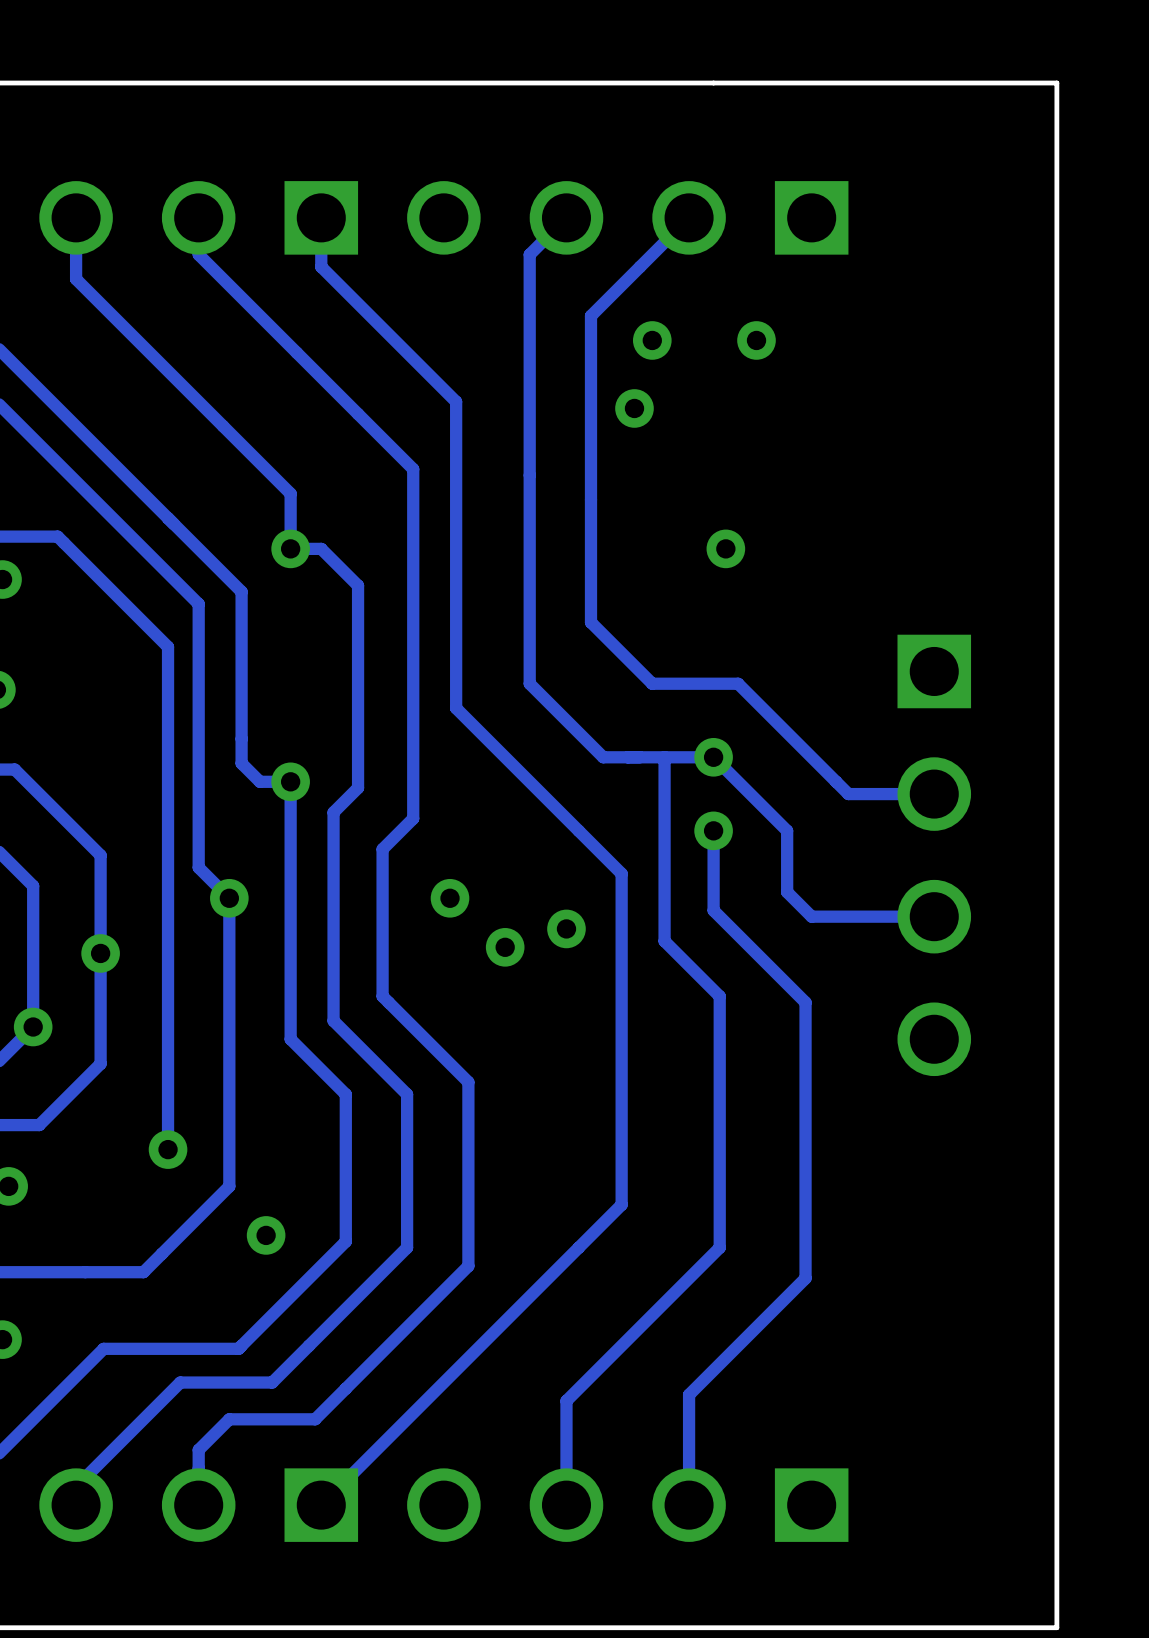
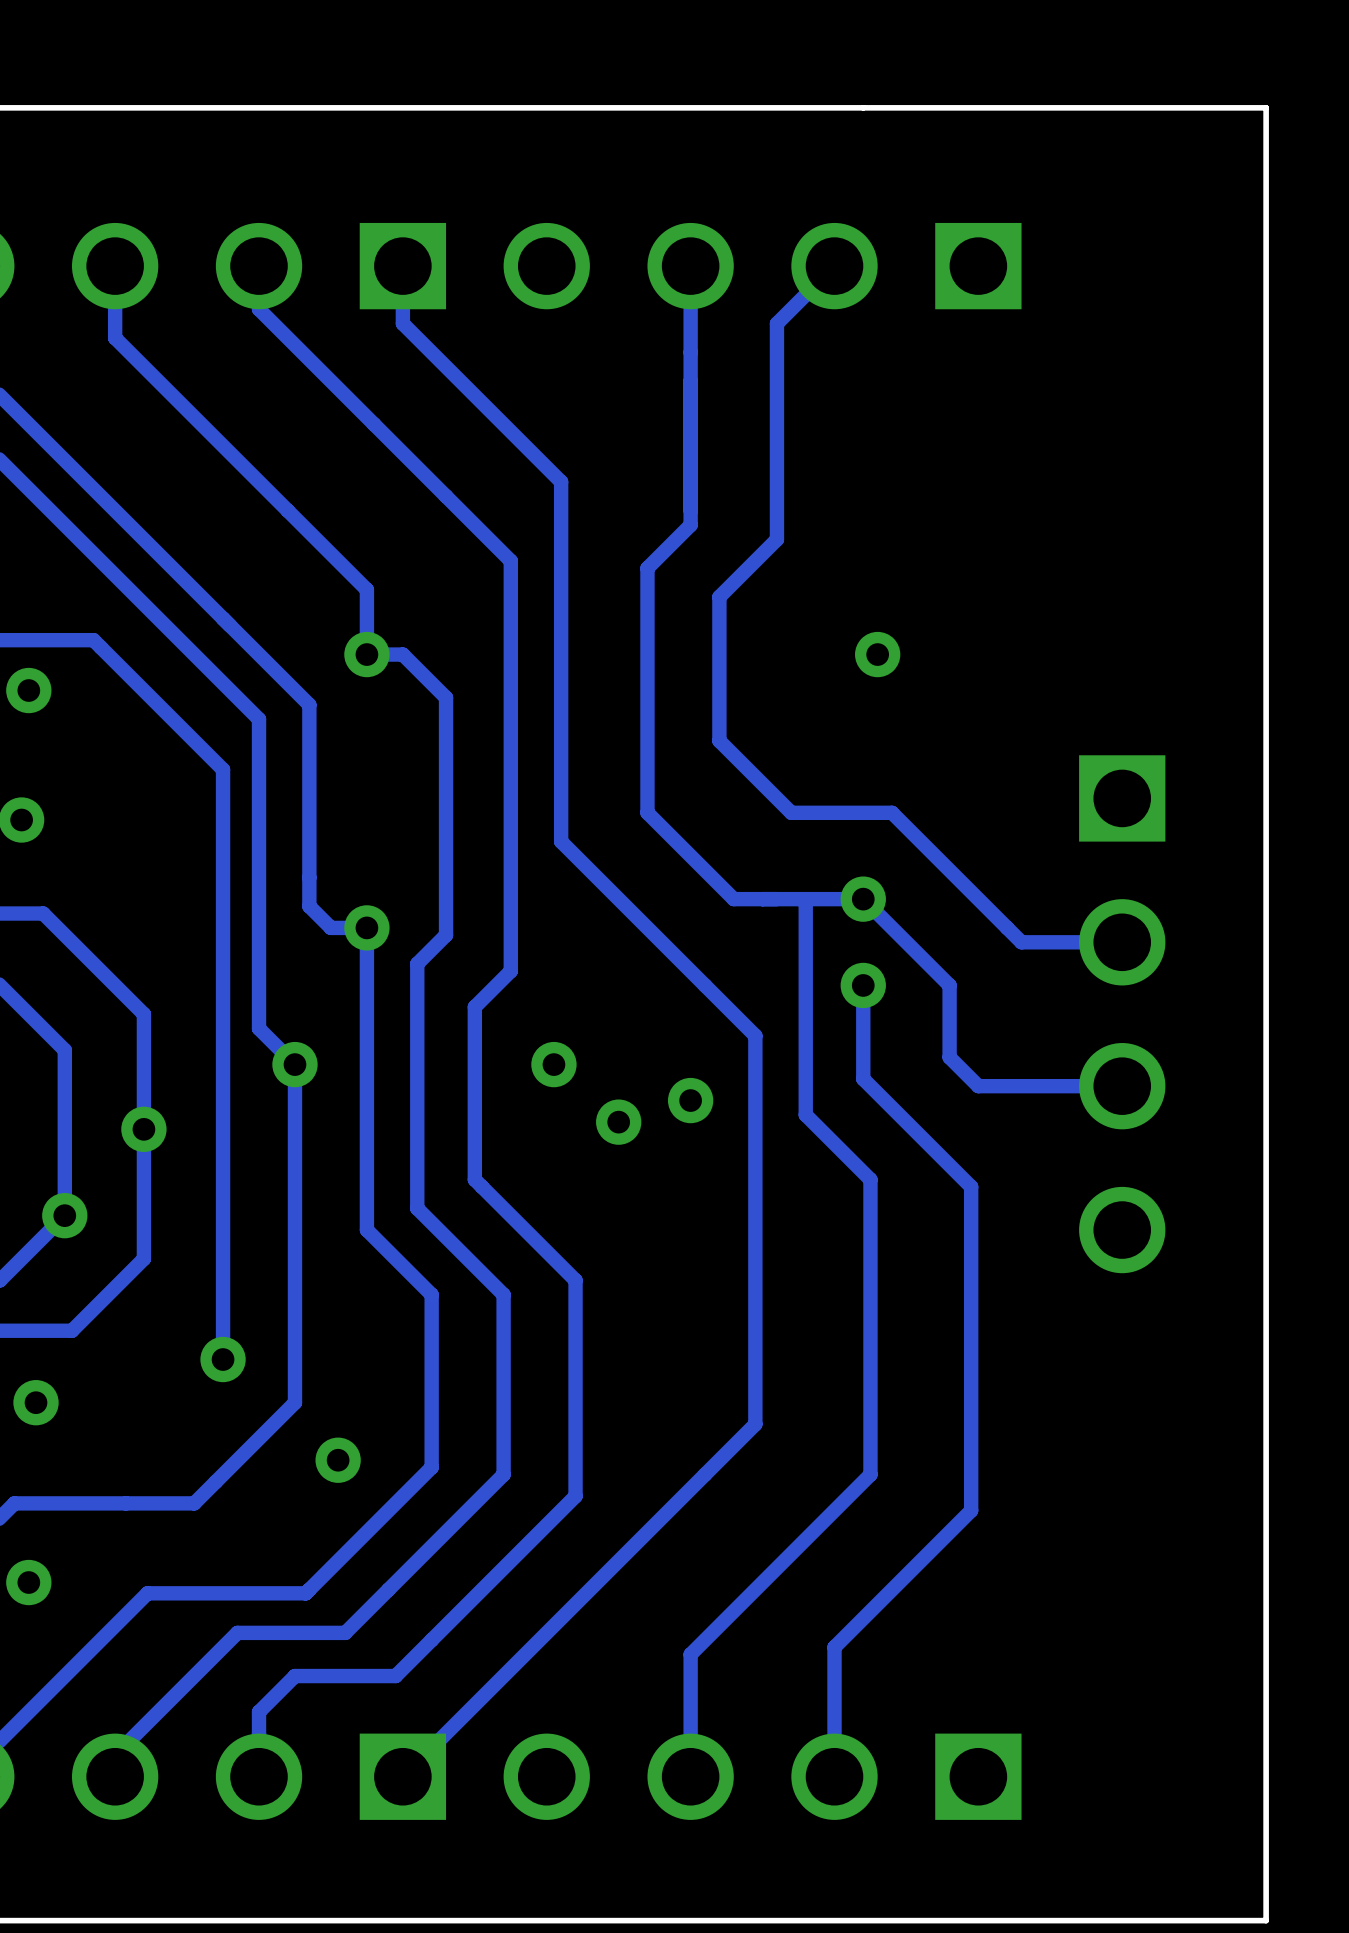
track: (566, 217) (529, 254) (529, 475) -> (690, 266) (690, 525) (647, 568)
track: (640, 266) (591, 315) (591, 499) -> (776, 323) (776, 539) (719, 597)
via: (652, 340) -> none
via: (756, 340) -> none
via: (634, 408) -> none

